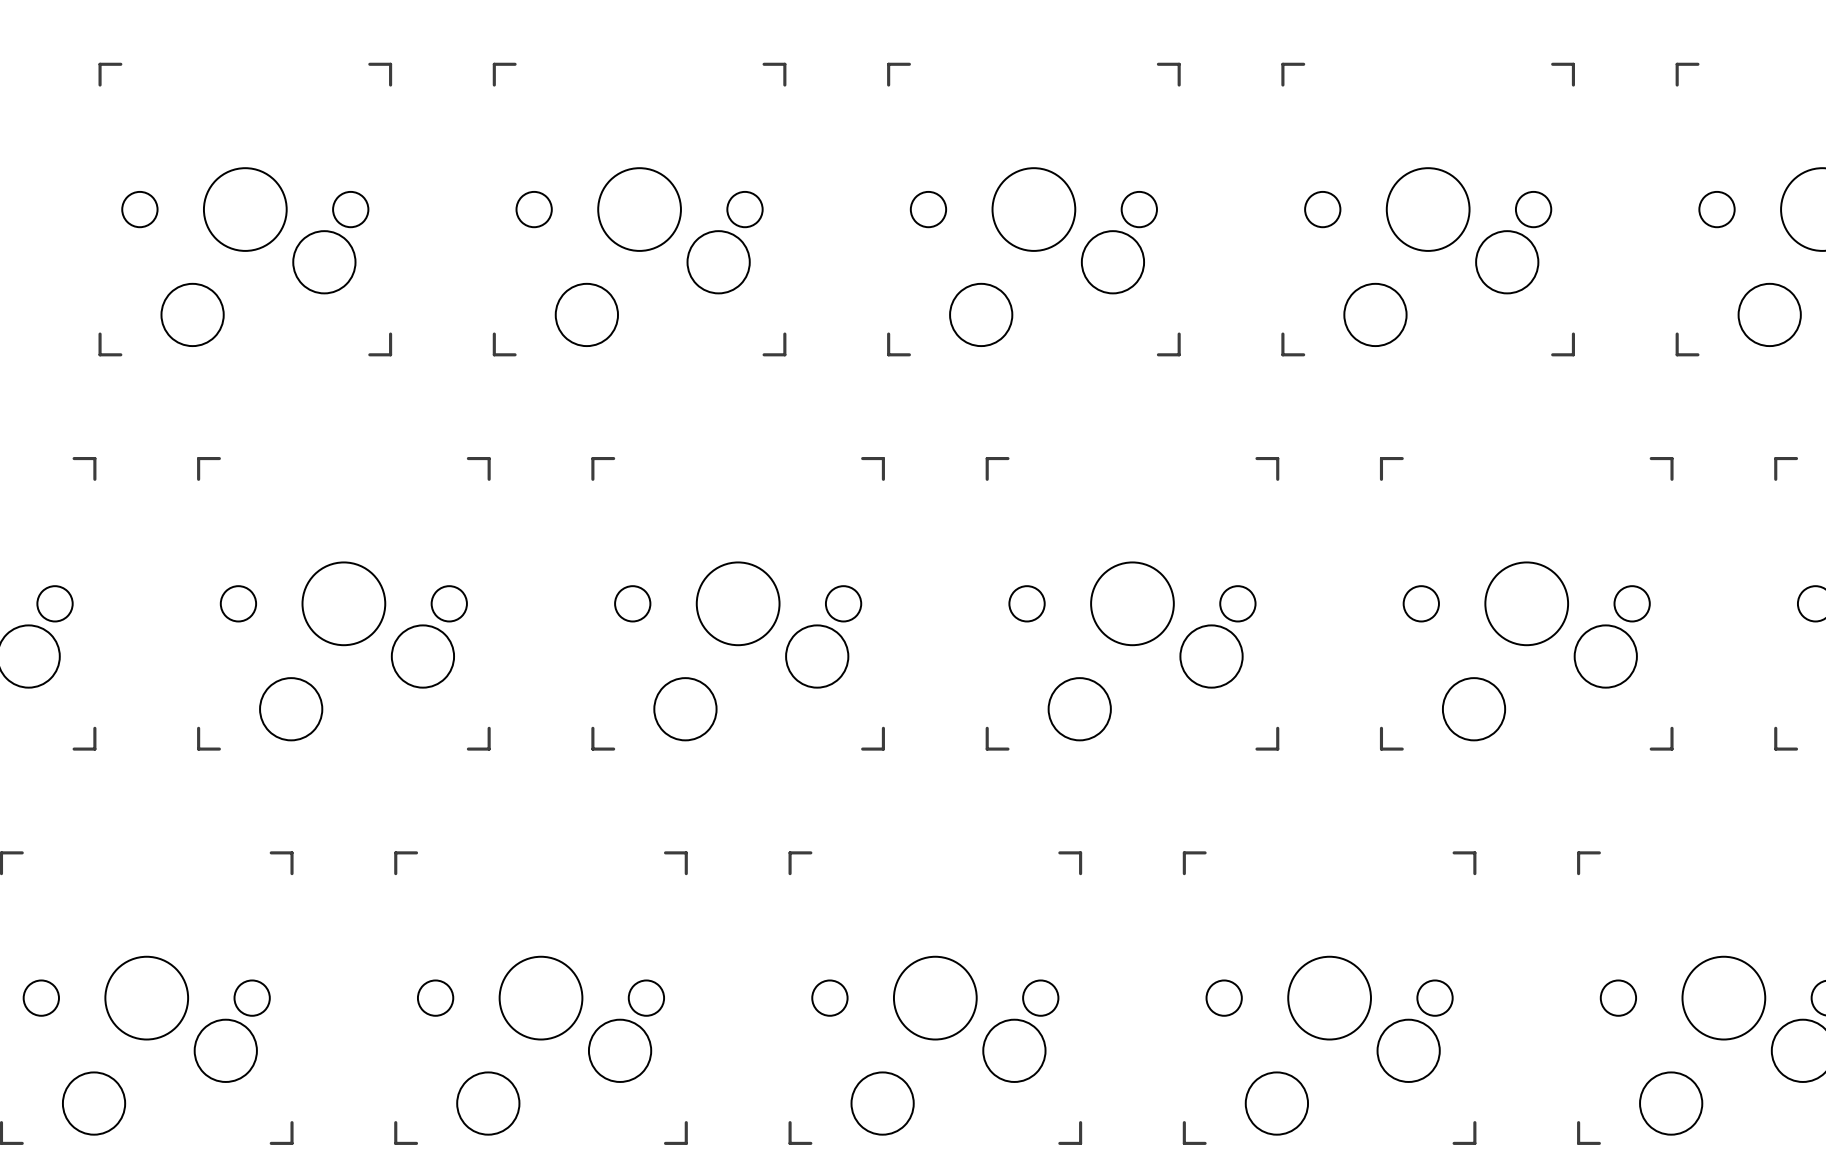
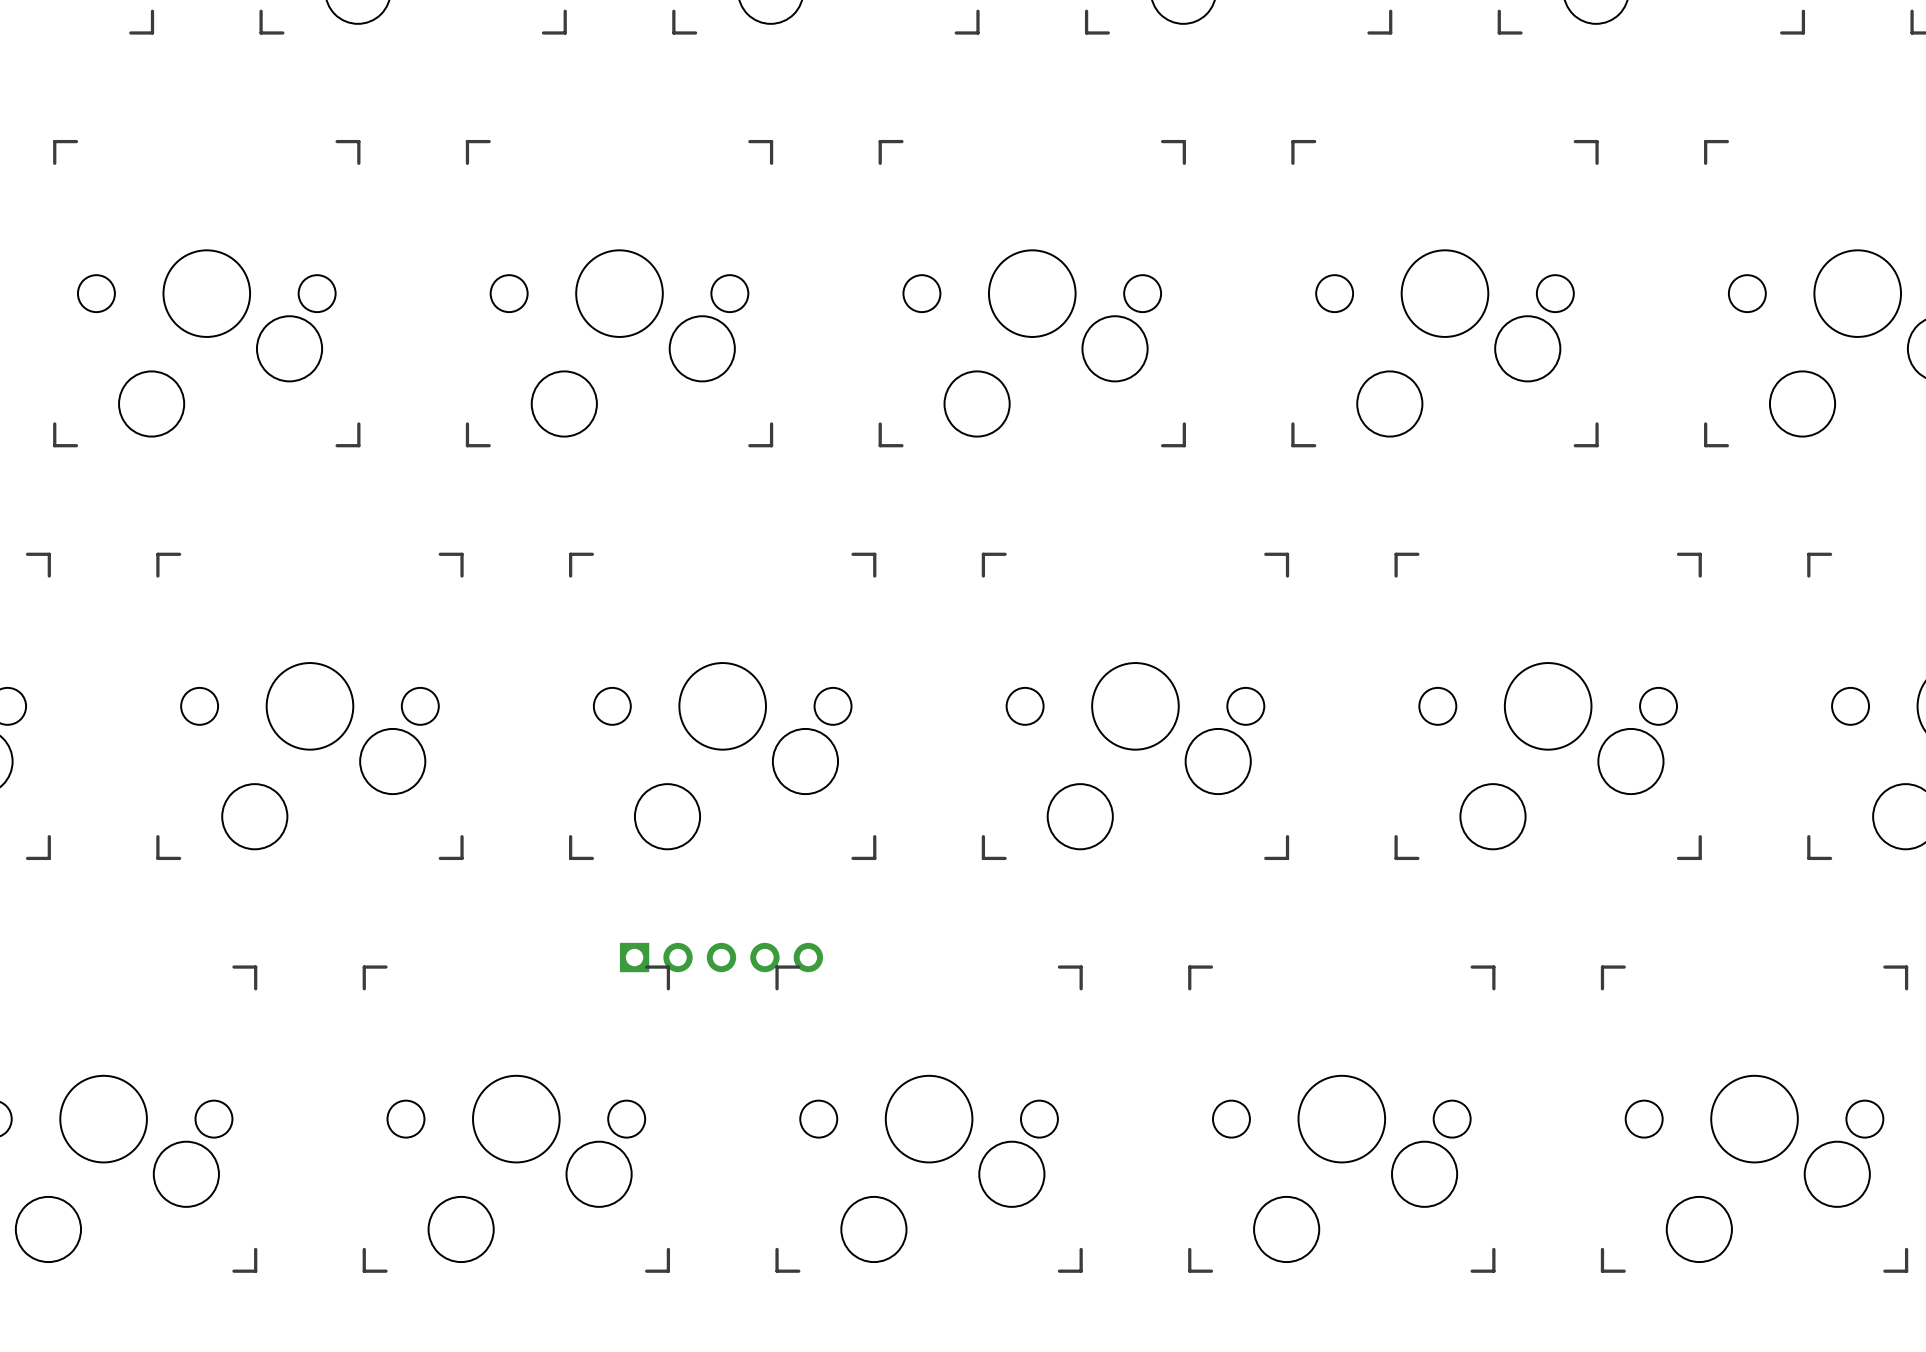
part: none -> (721, 957)

